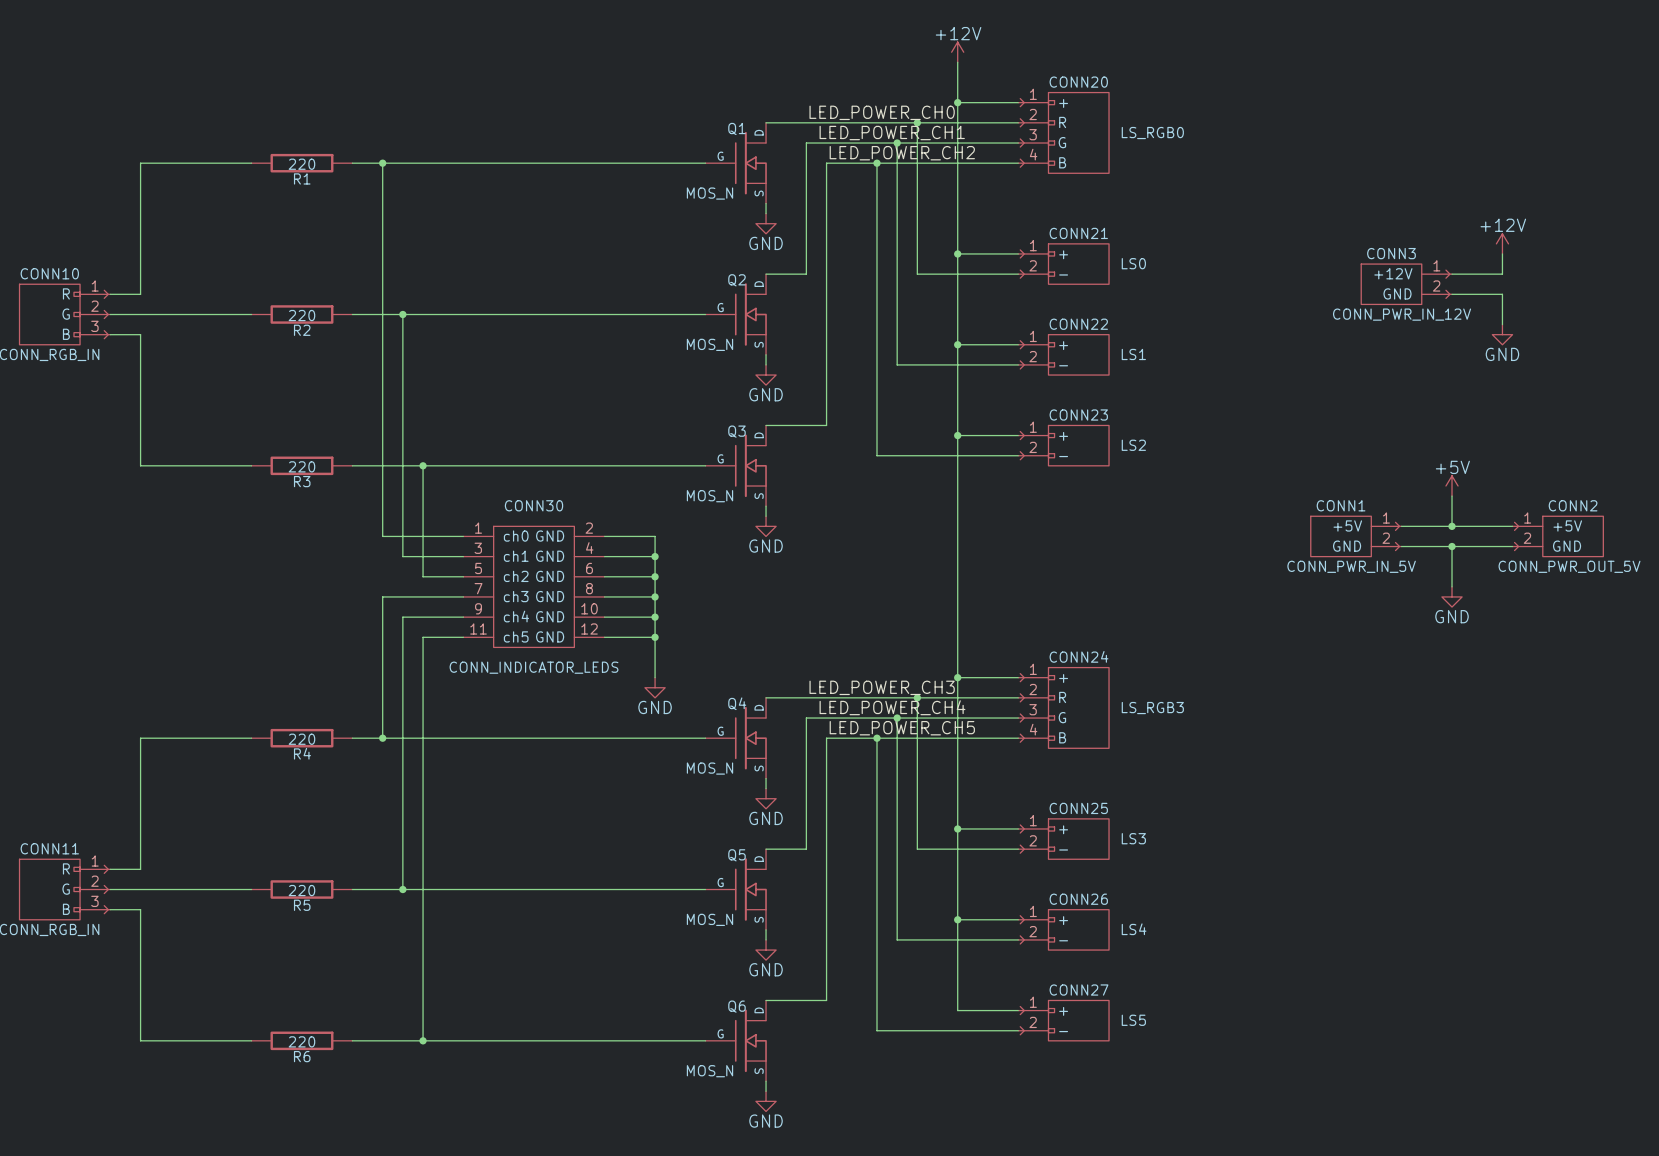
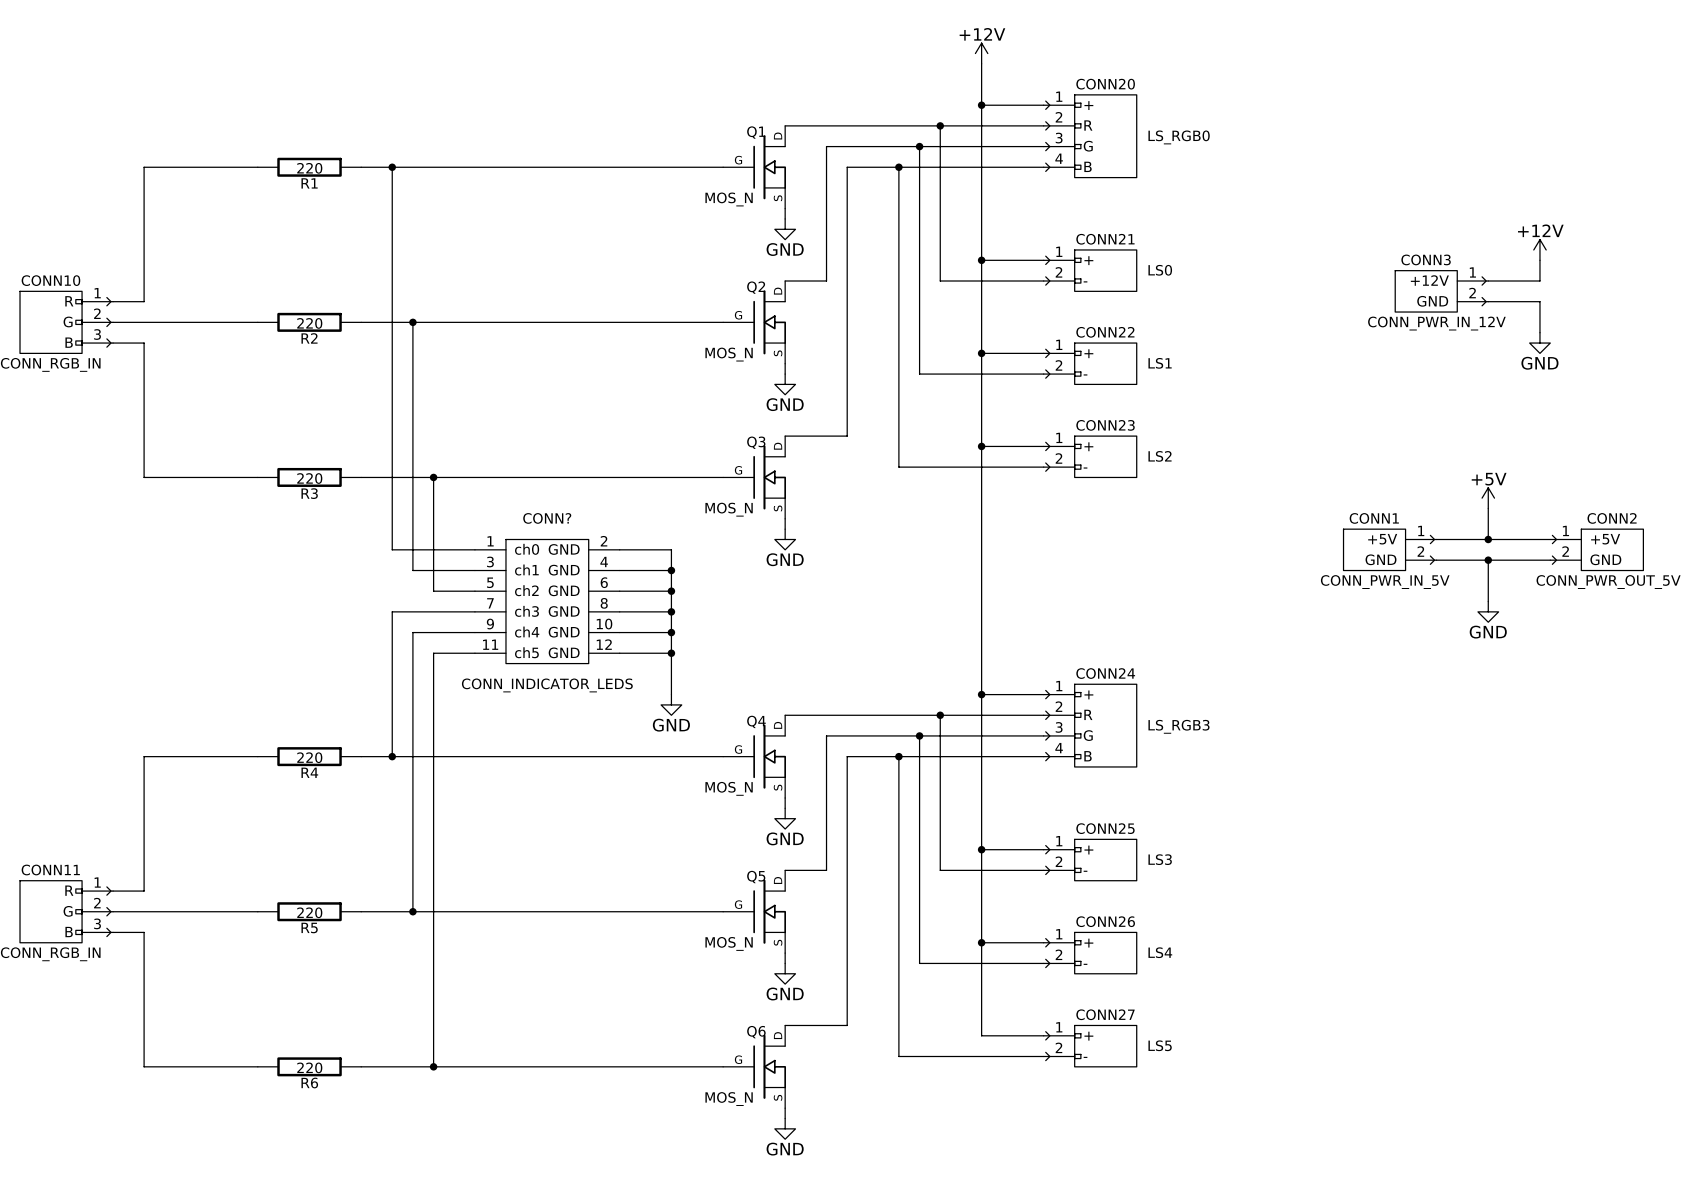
label: LED_POWER_CH0 (882, 112) -> none
label: LED_POWER_CH1 (892, 133) -> none
label: LED_POWER_CH2 (902, 153) -> none
CONN30 name: CONN30 (534, 505) -> CONN? (547, 518)
label: LED_POWER_CH3 (882, 687) -> none
label: LED_POWER_CH4 (892, 707) -> none
label: LED_POWER_CH5 (902, 728) -> none

